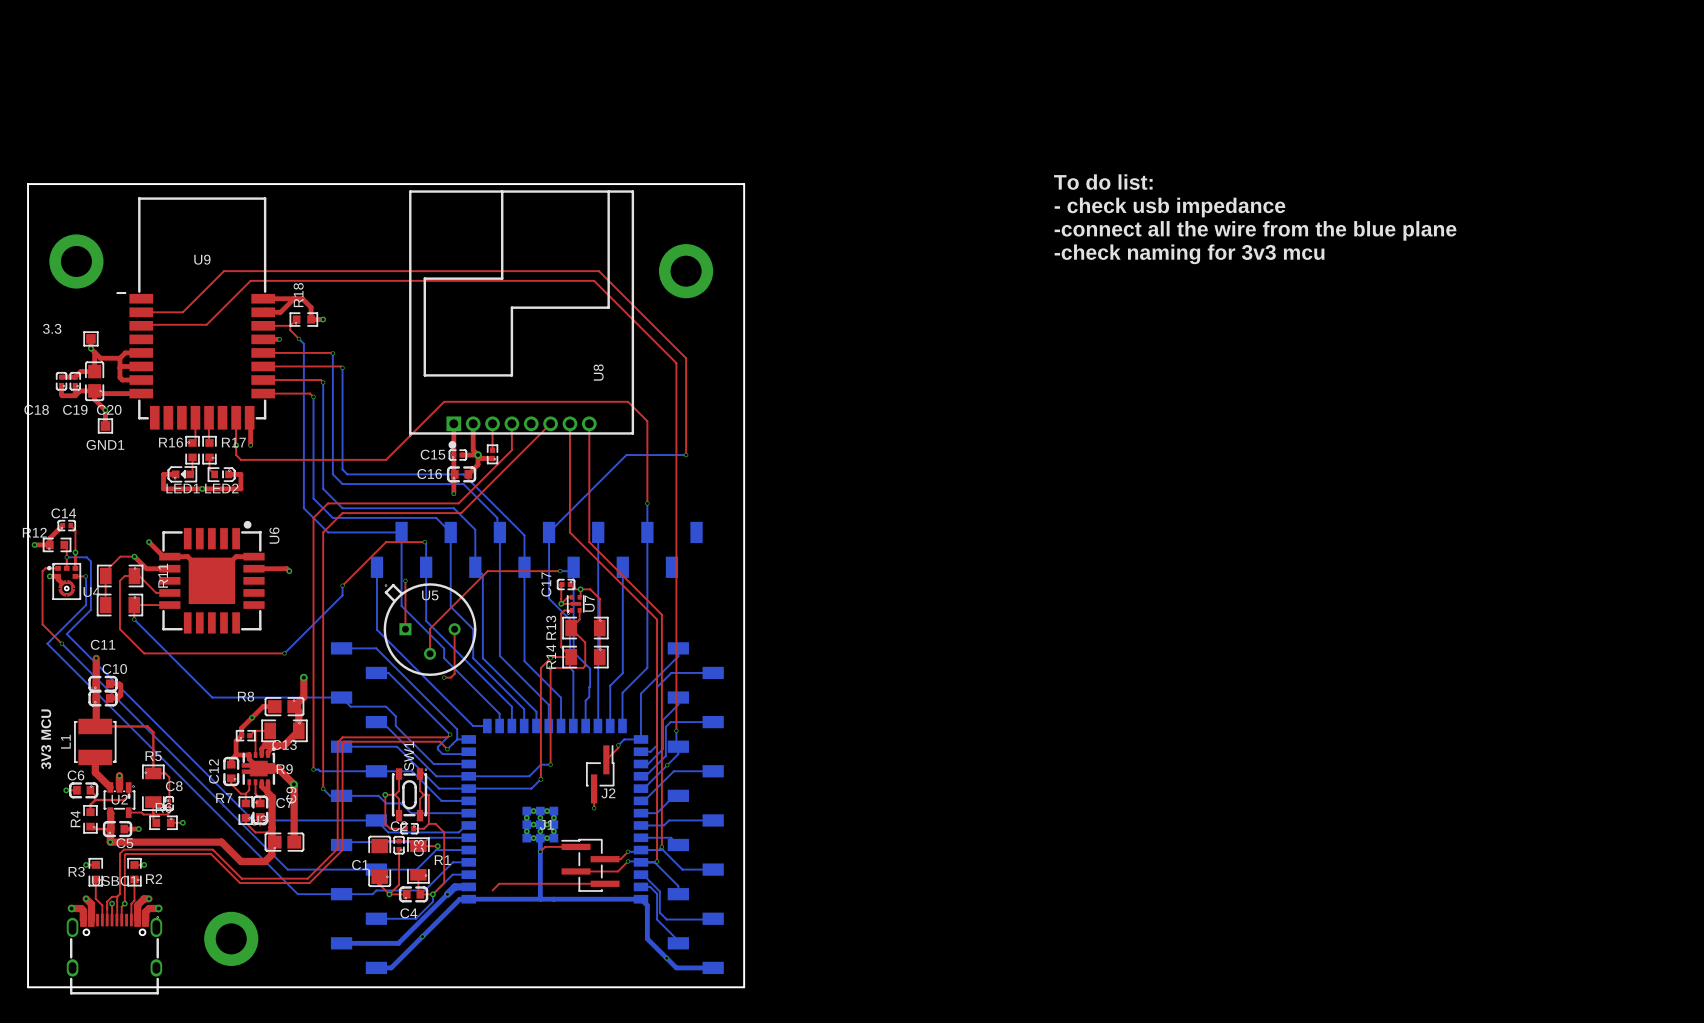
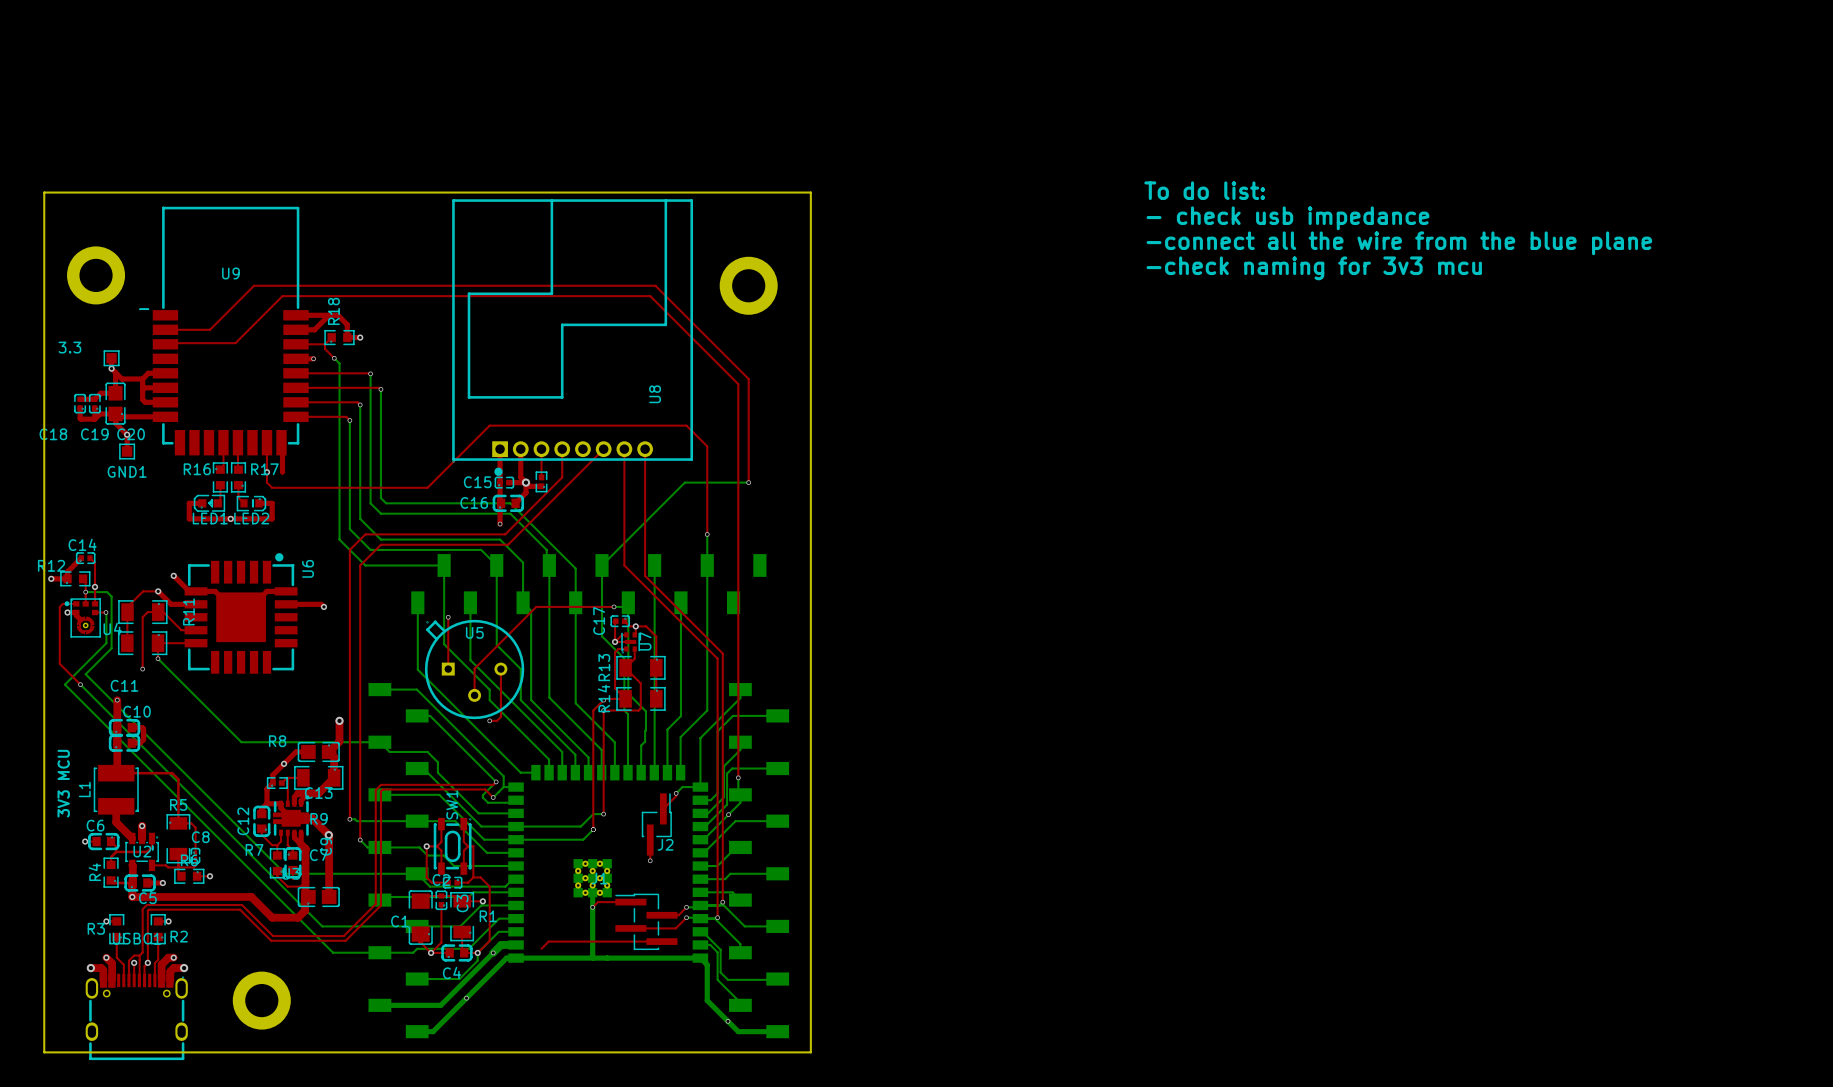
via: (250, 445) -> none
top track: (424, 542) (386, 542) (342, 585) -> none
bottom track: (424, 542) (426, 567) -> none
via: (424, 542) -> none
bottom track: (342, 585) (342, 595) (284, 653) -> none
via: (342, 585) -> none
top track: (119, 629) (144, 653) (284, 653) -> none
via: none -> (142, 669)
via: (284, 653) -> none

